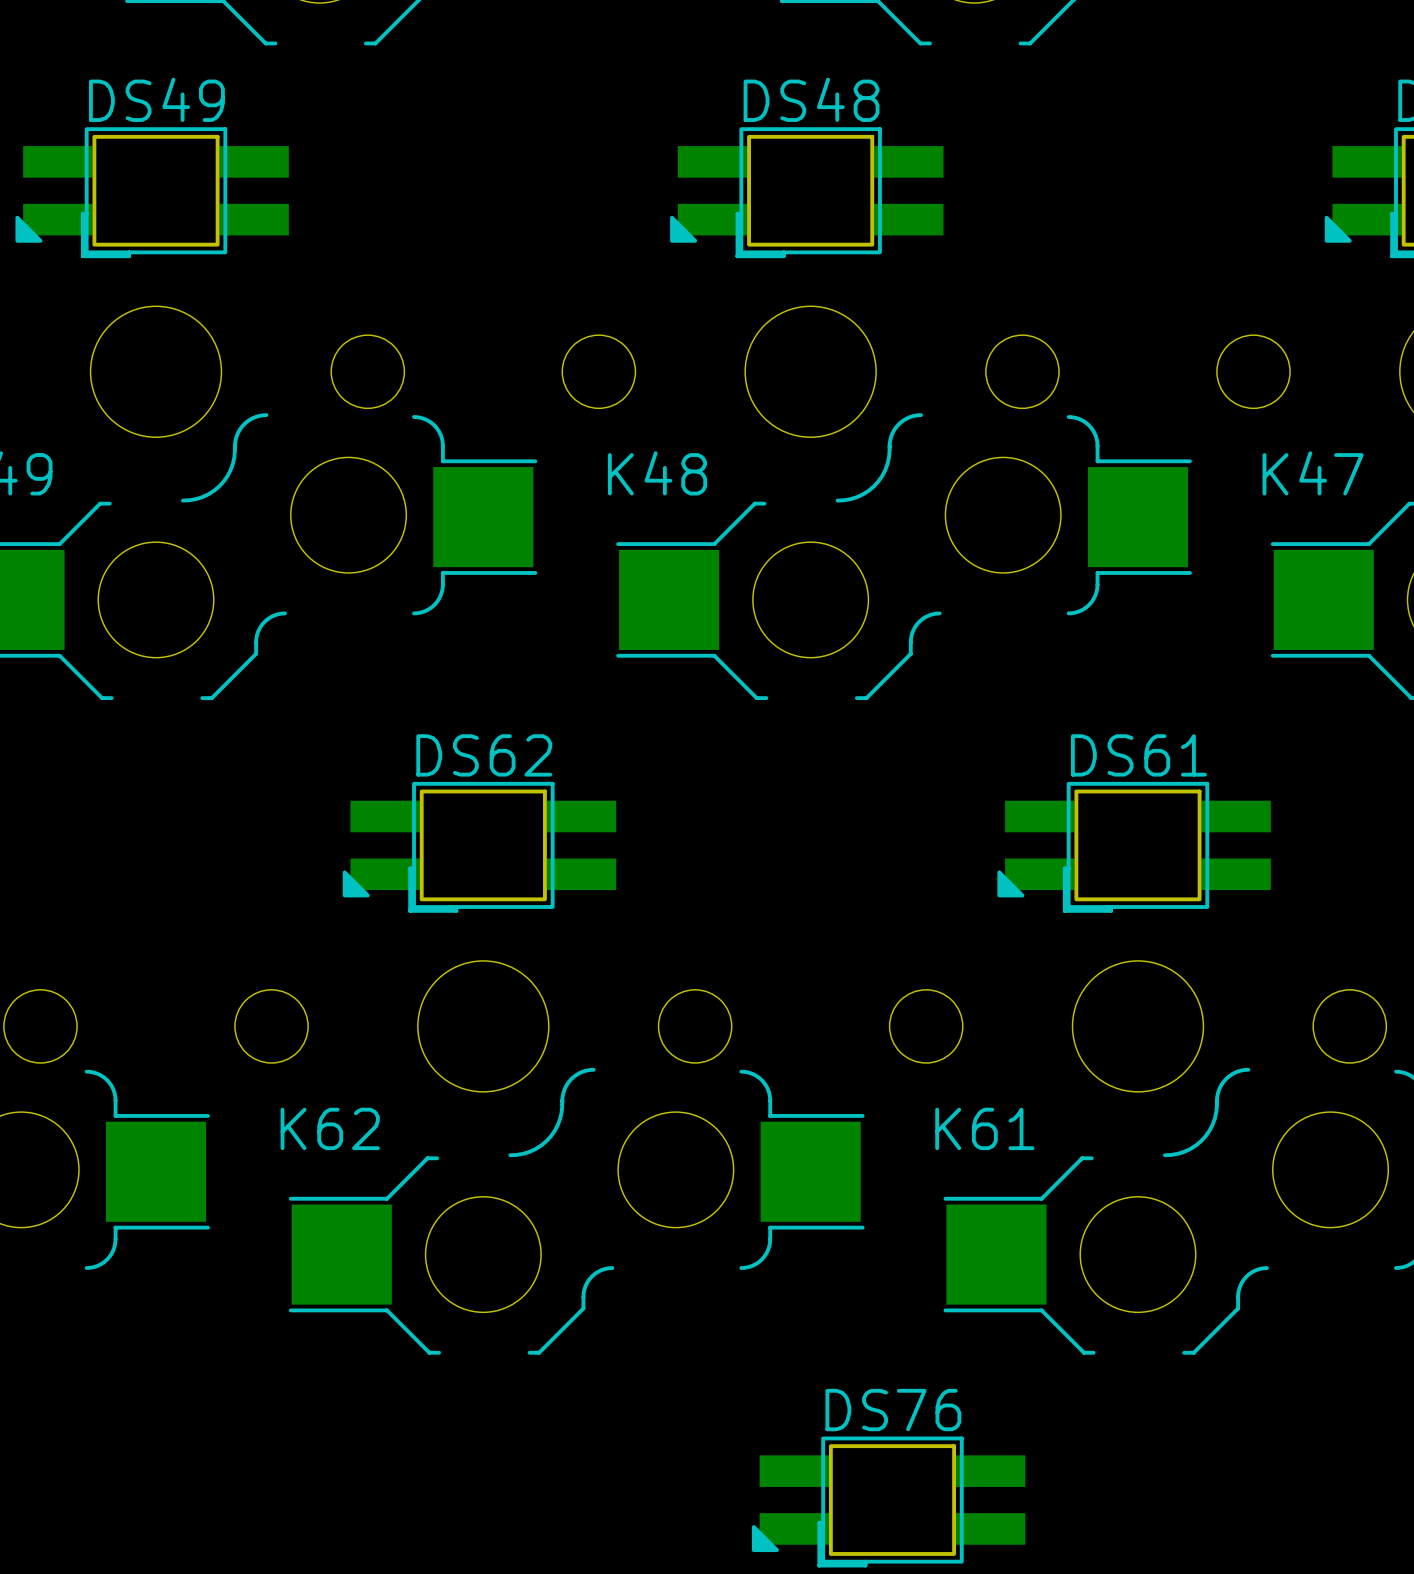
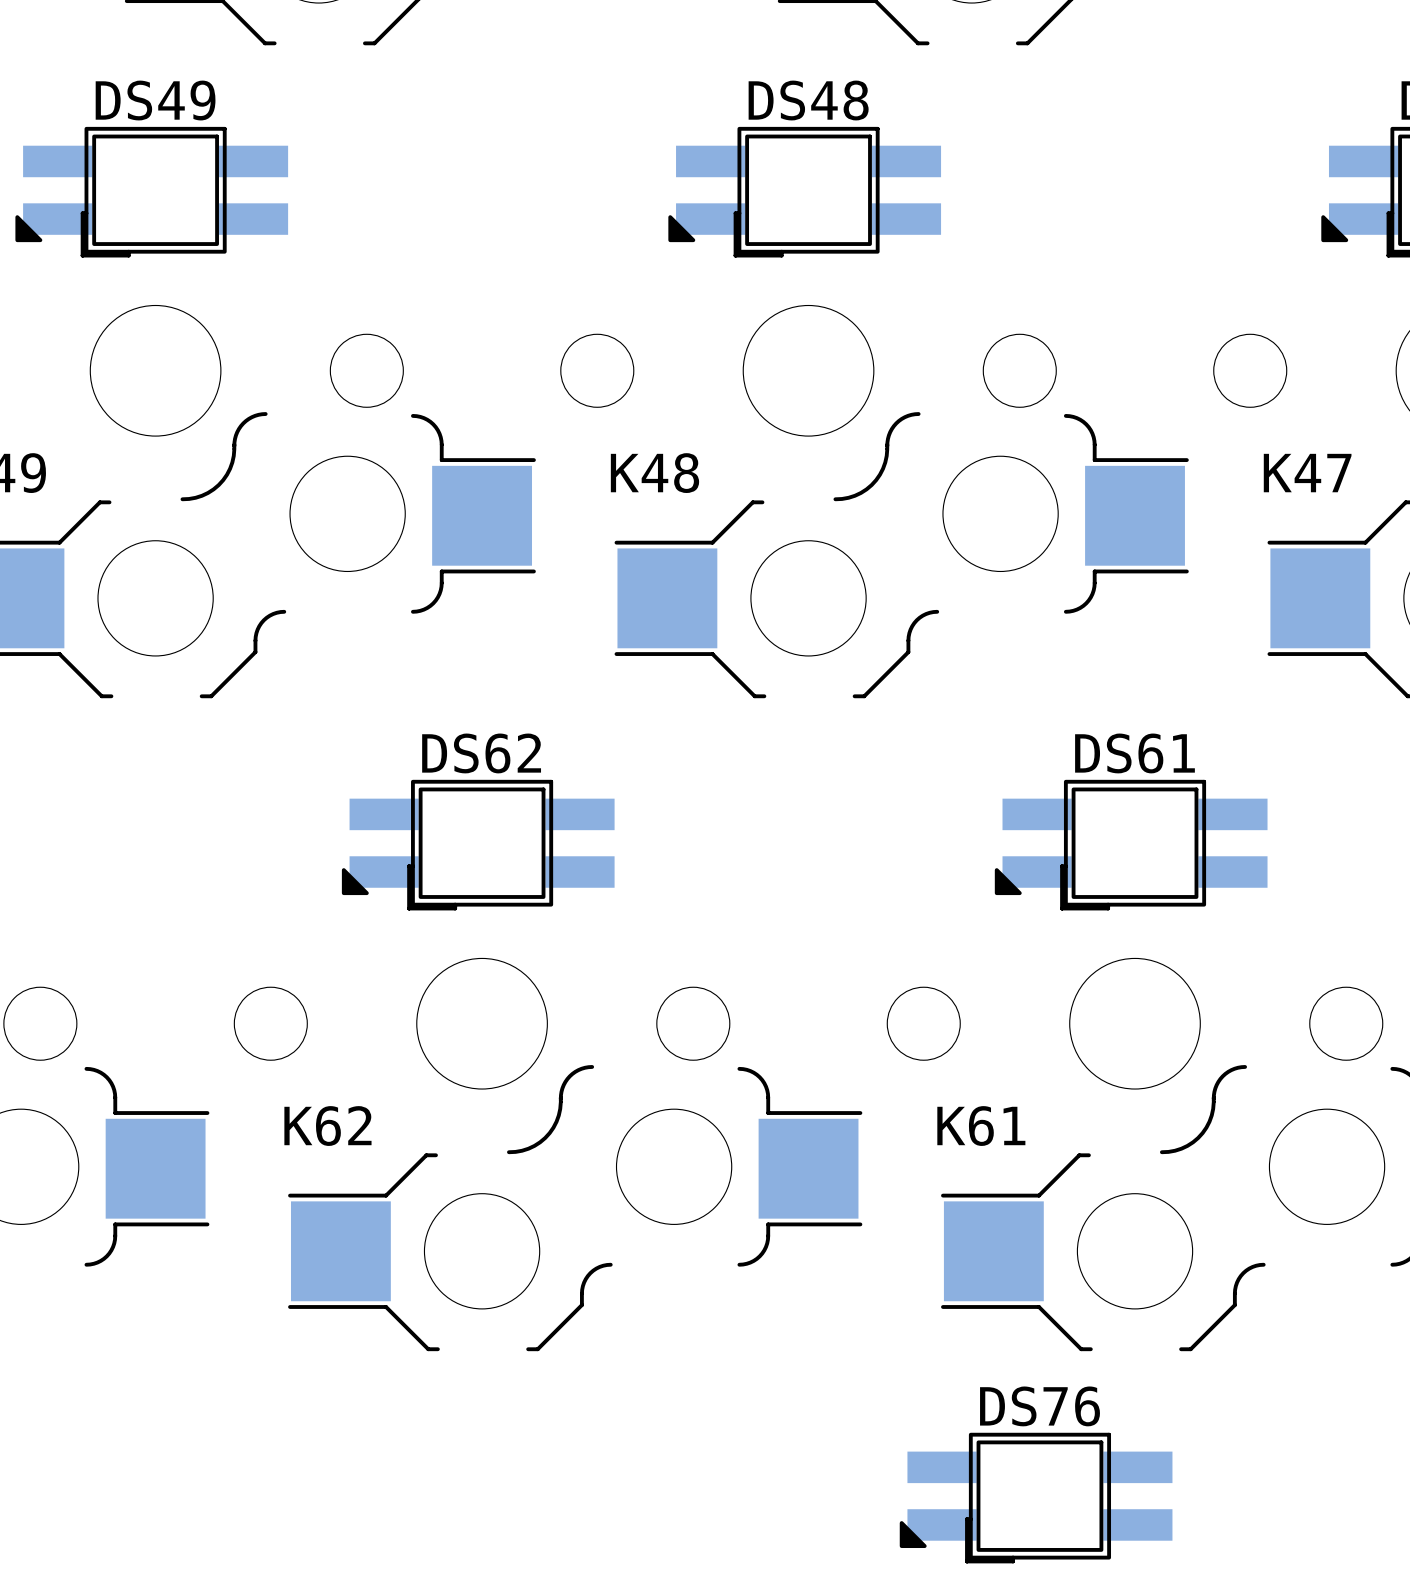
DS76 position: (888, 1501) -> (1036, 1498)

